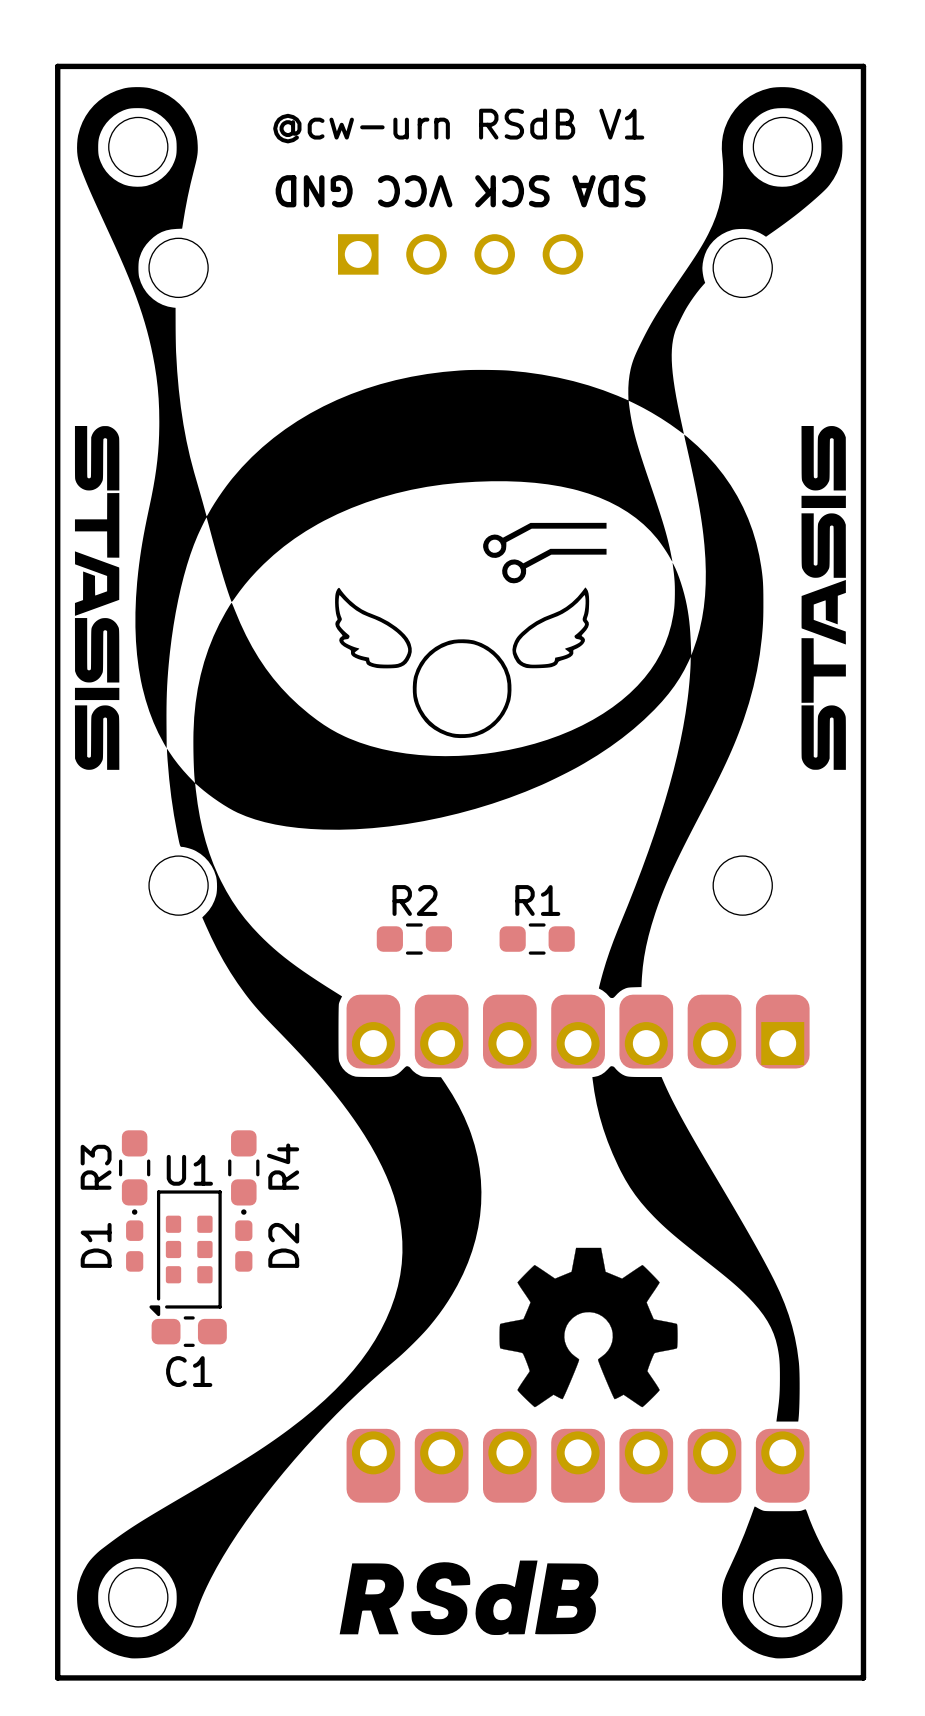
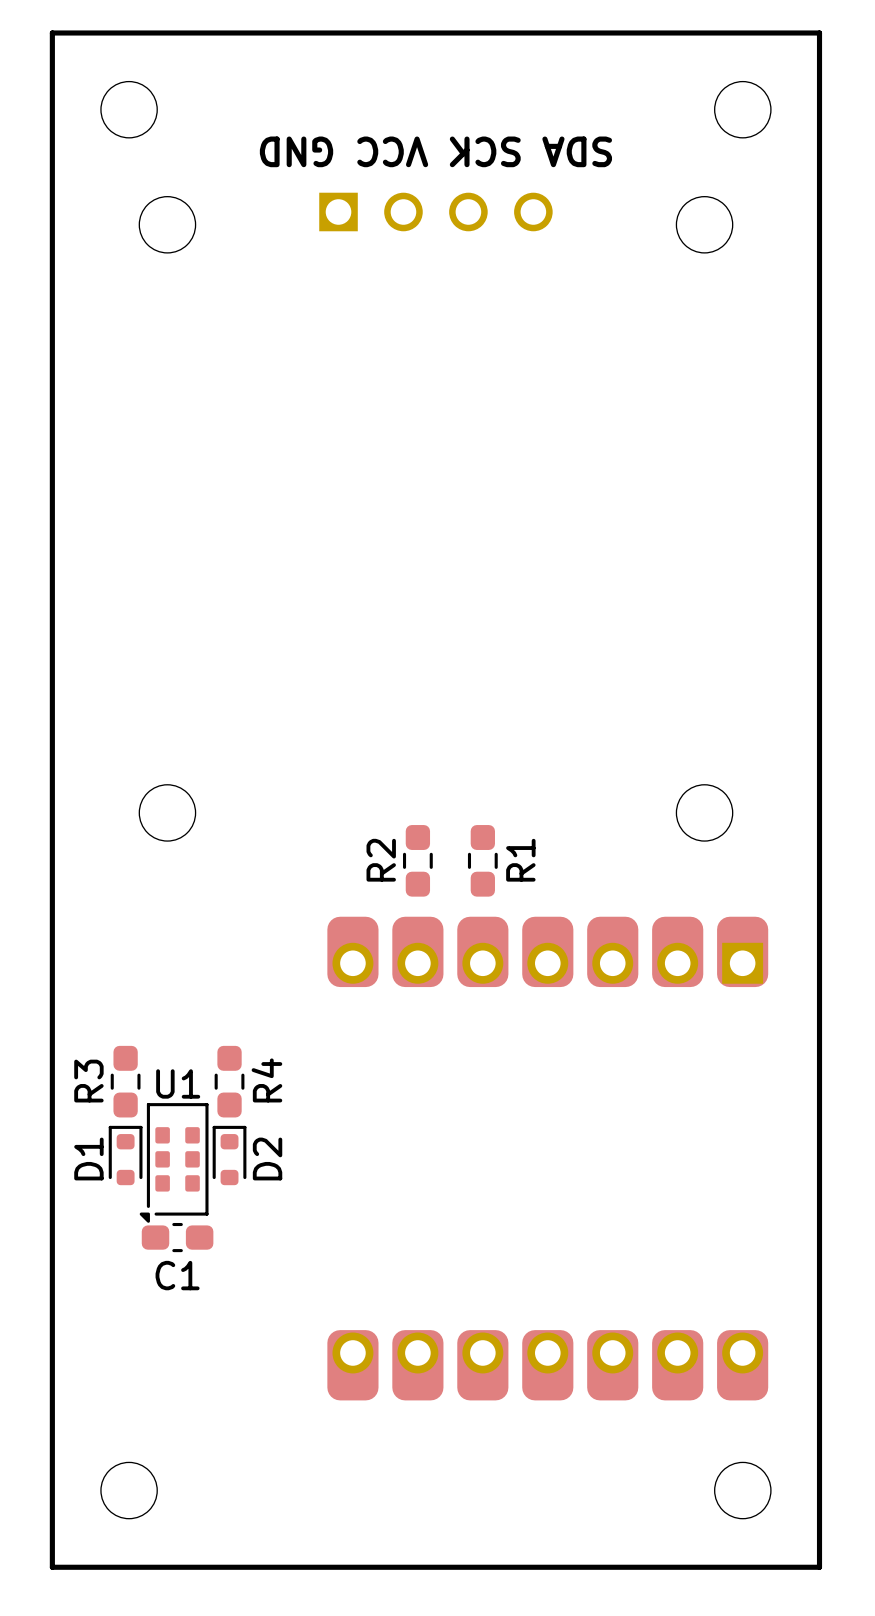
drawing: [74, 87, 846, 1659] -> none
text: @cw-urn RSdB V1 (458, 126) -> none
R2 rotation: 0° (414, 939) -> 90° clockwise (417, 860)
R1 rotation: 0° (537, 939) -> 90° clockwise (482, 860)
D1 footprint: [126, 1209, 144, 1272] -> [108, 1125, 143, 1186]
D2 footprint: [235, 1209, 253, 1272] -> [212, 1125, 247, 1186]

